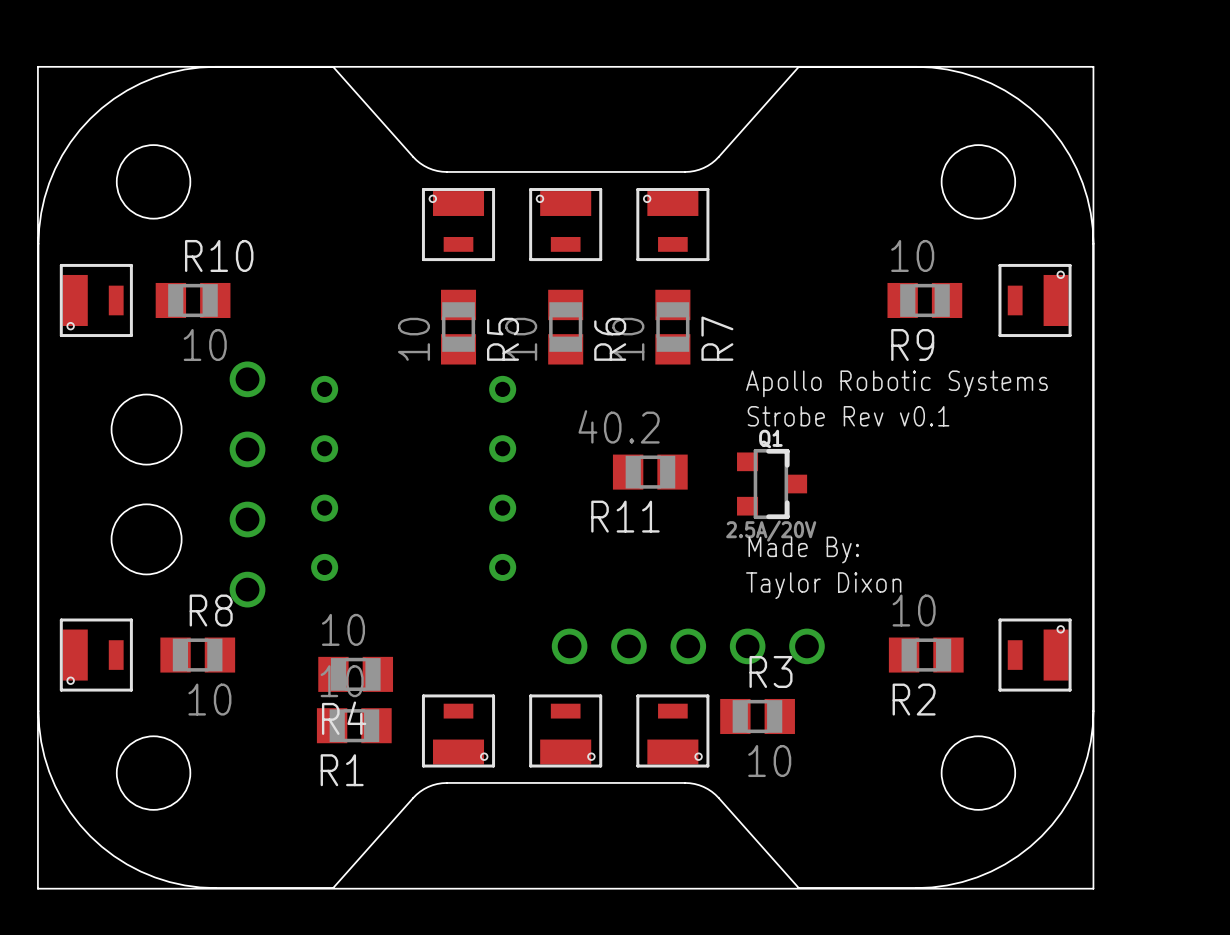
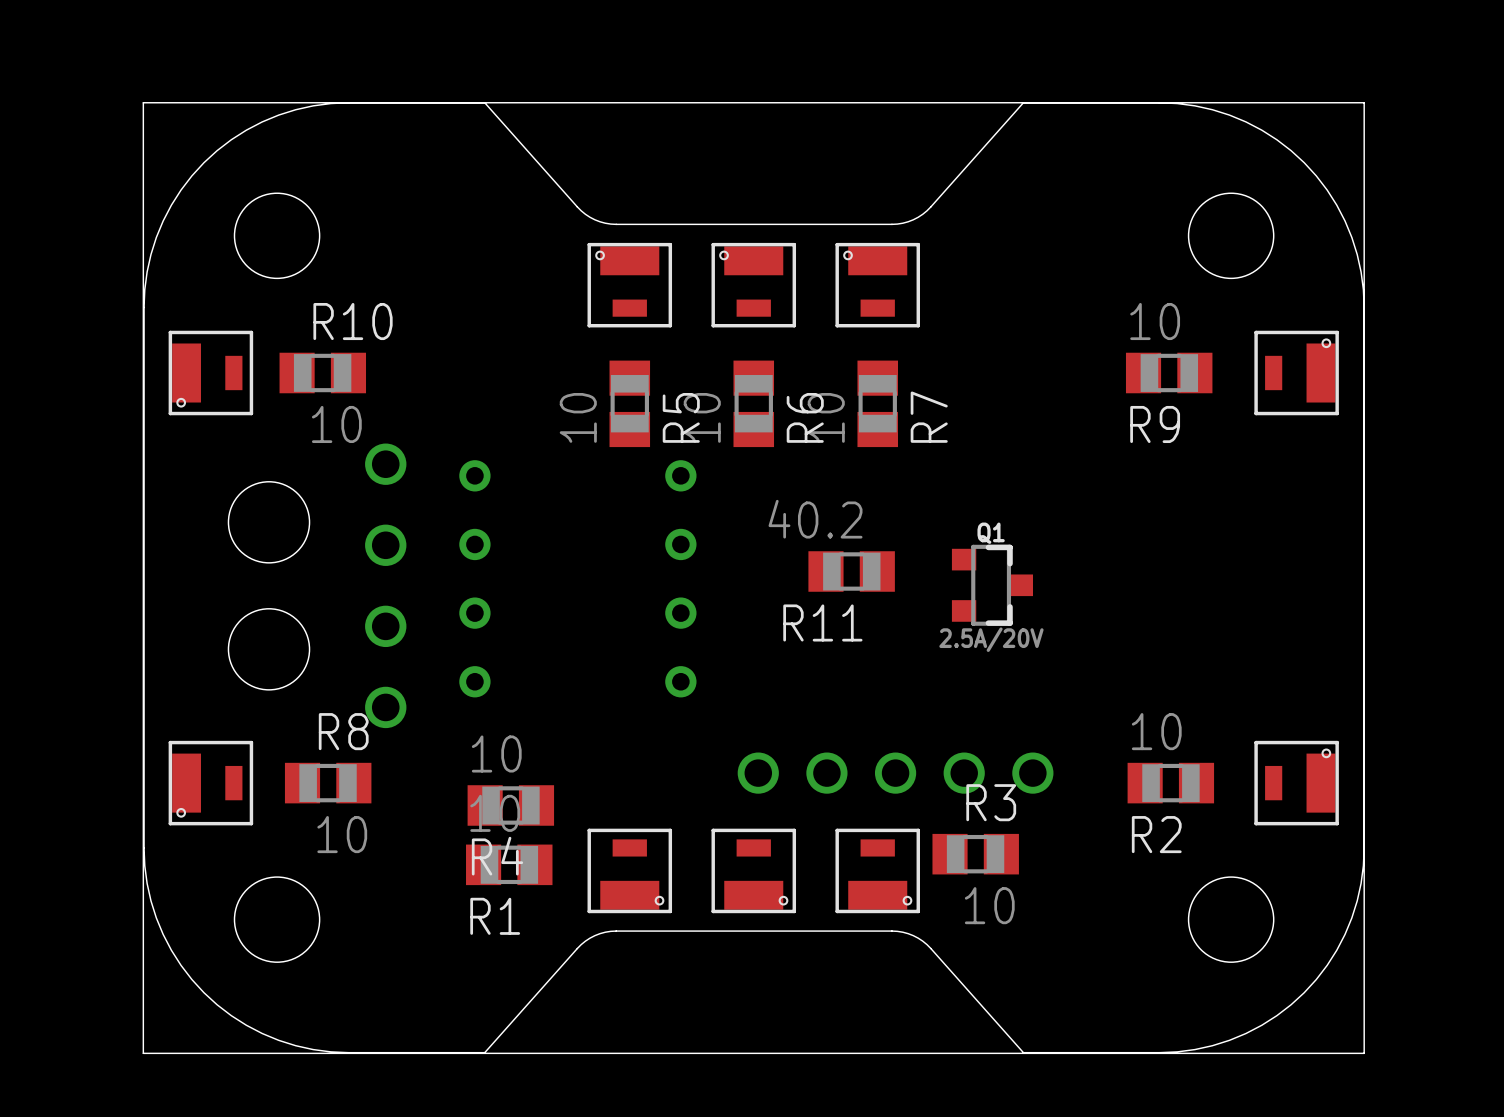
text: Apollo Robotic Systems (896, 383) -> none
text: Strobe Rev v0.1 (848, 416) -> none
text: Made By: (803, 550) -> none
text: Taylor Dixon (823, 585) -> none

